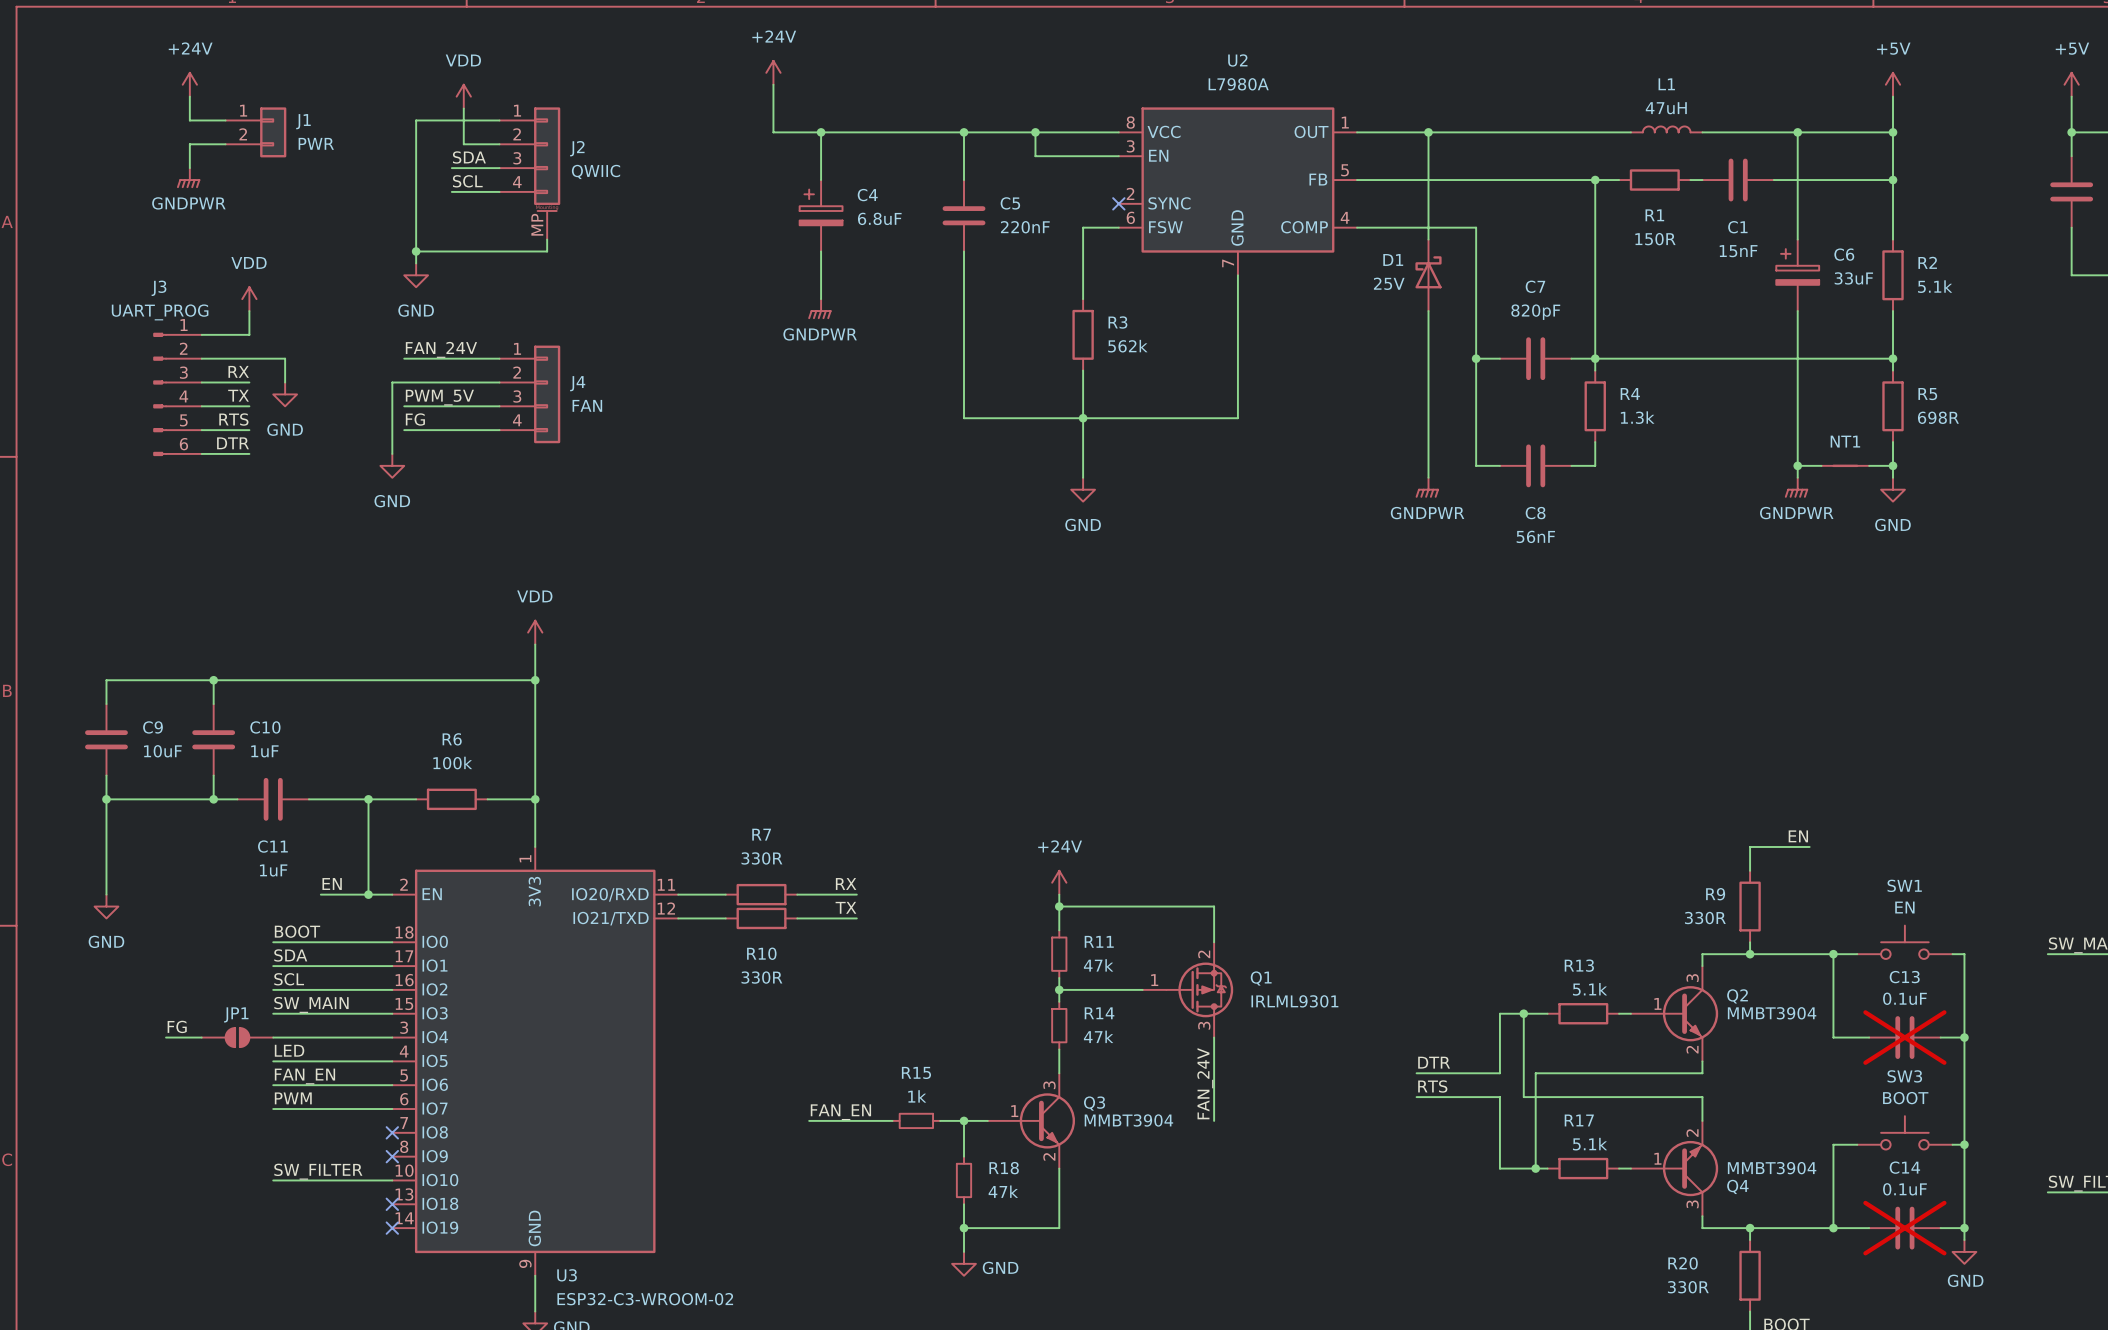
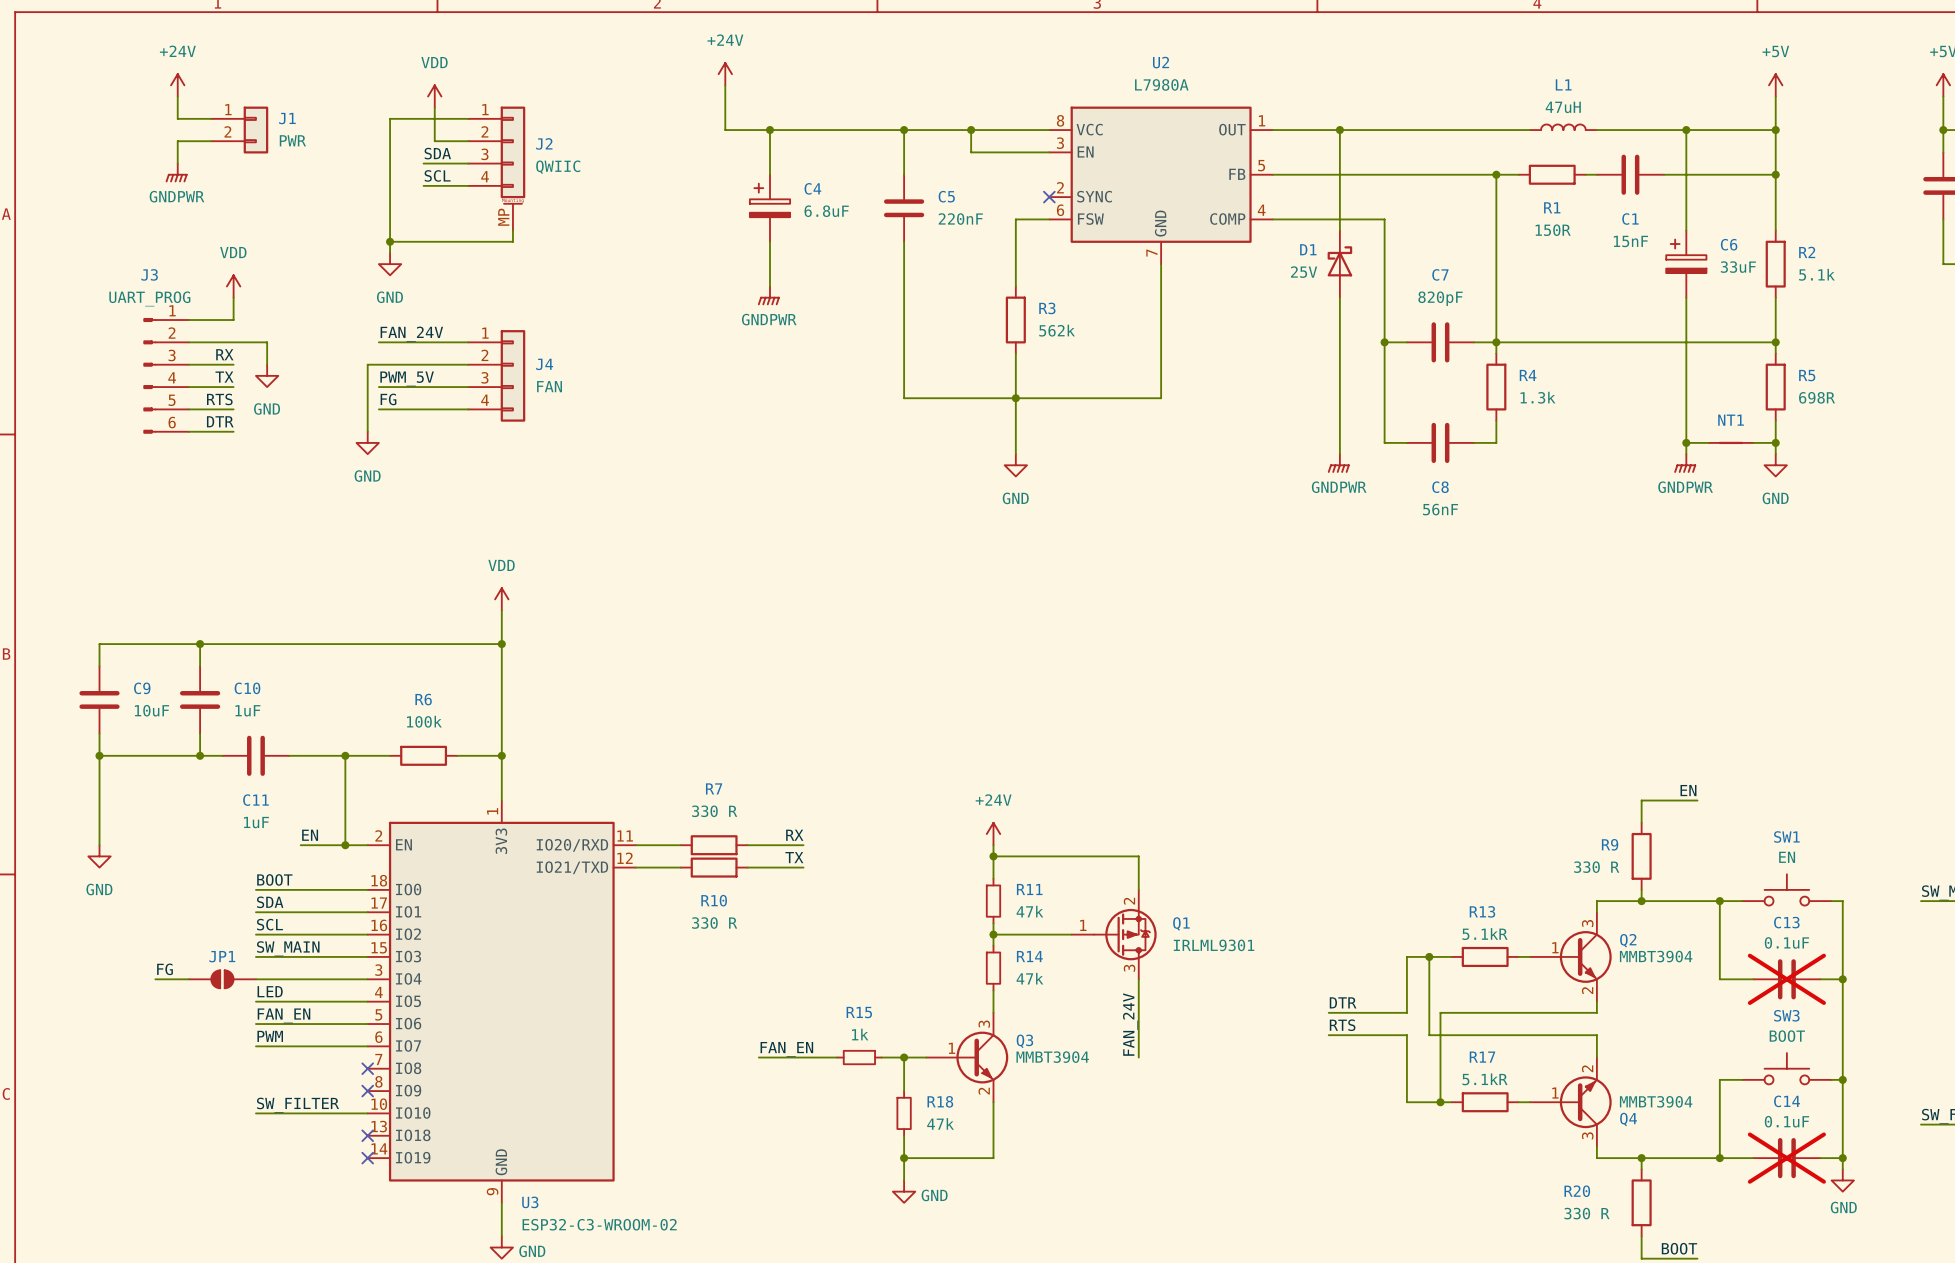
R7 value: 330R (761, 858) -> 330 R (714, 811)
R9 value: 330R (1705, 918) -> 330 R (1596, 867)
R10 value: 330R (761, 977) -> 330 R (714, 923)
R13 value: 5.1k (1590, 989) -> 5.1kR (1484, 934)
R17 value: 5.1k (1590, 1144) -> 5.1kR (1484, 1079)
R20 value: 330R (1688, 1287) -> 330 R (1586, 1213)

